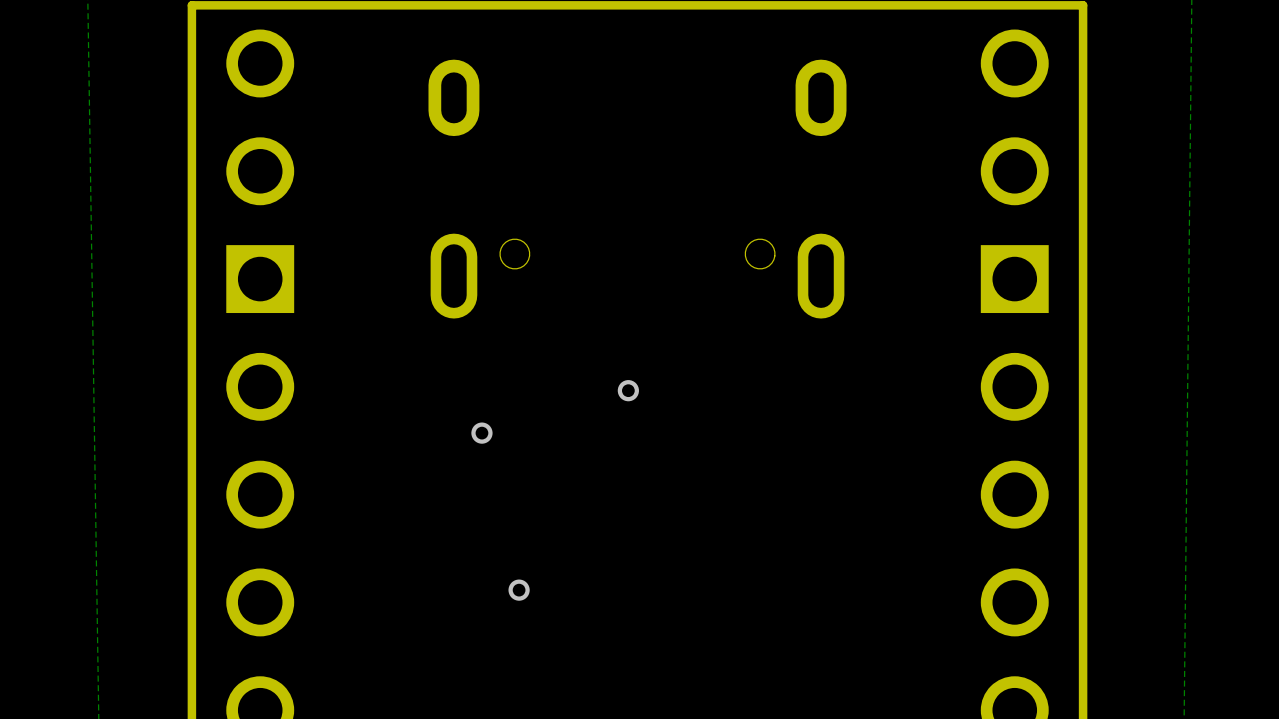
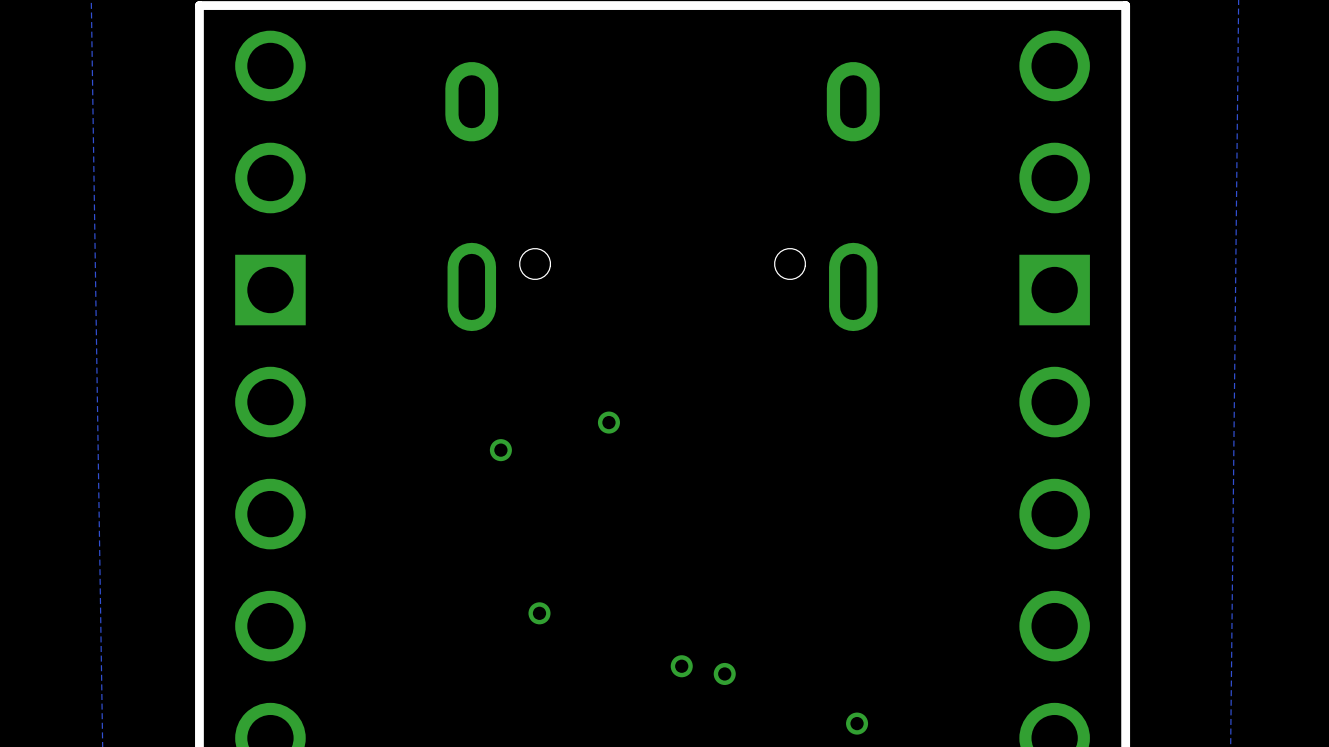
via position: (628, 390) -> (608, 422)
via: none -> (681, 666)
via: none -> (724, 673)
via: none -> (857, 723)

